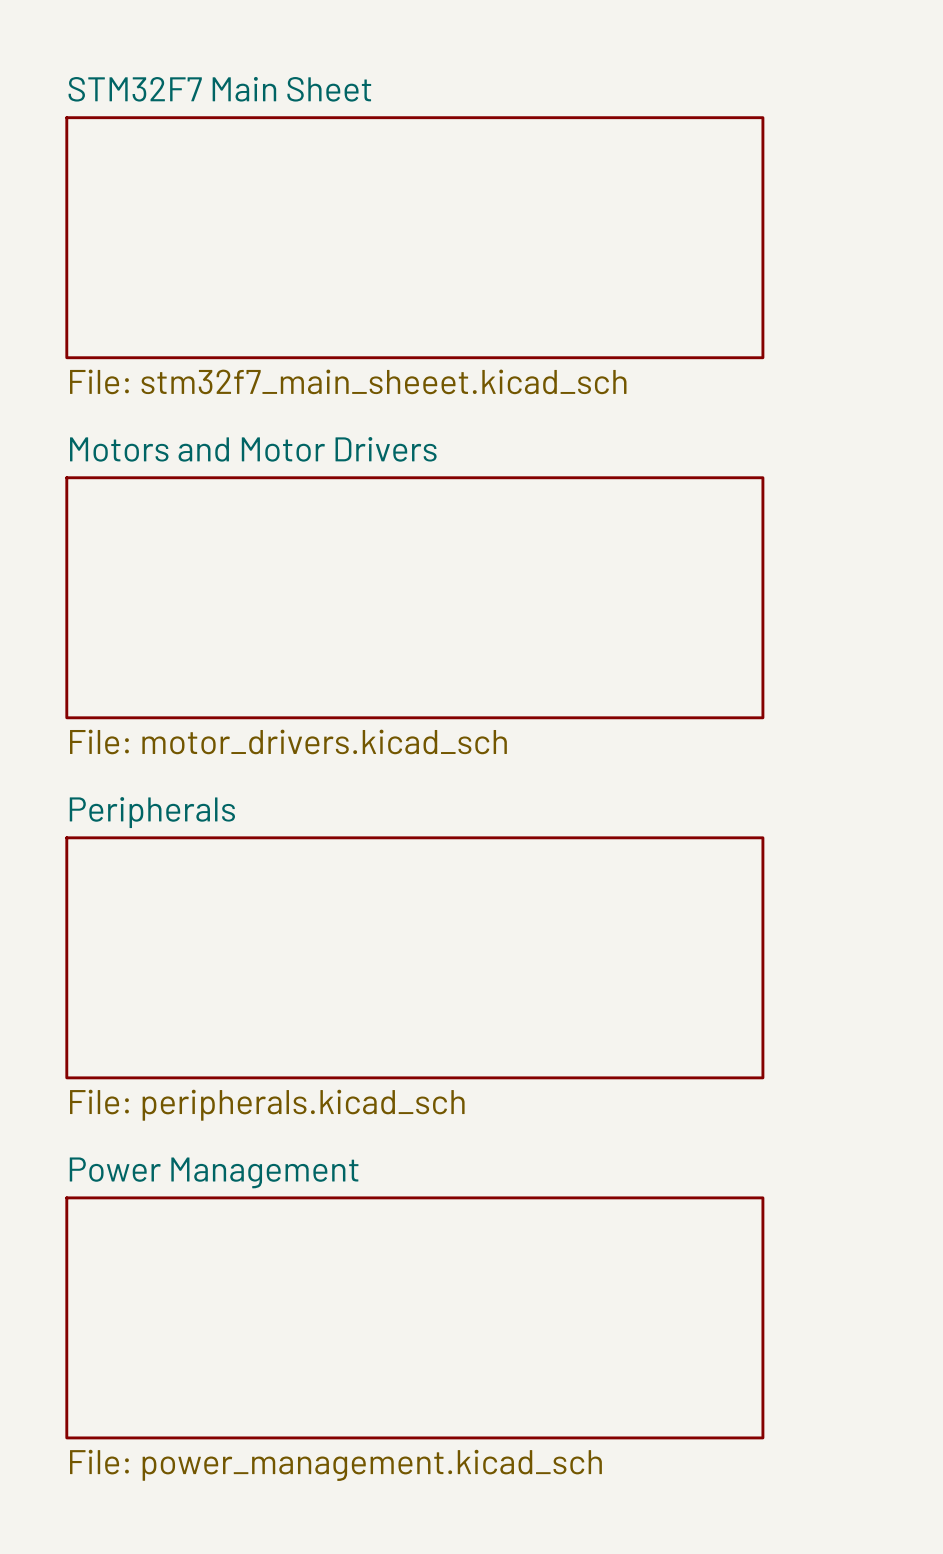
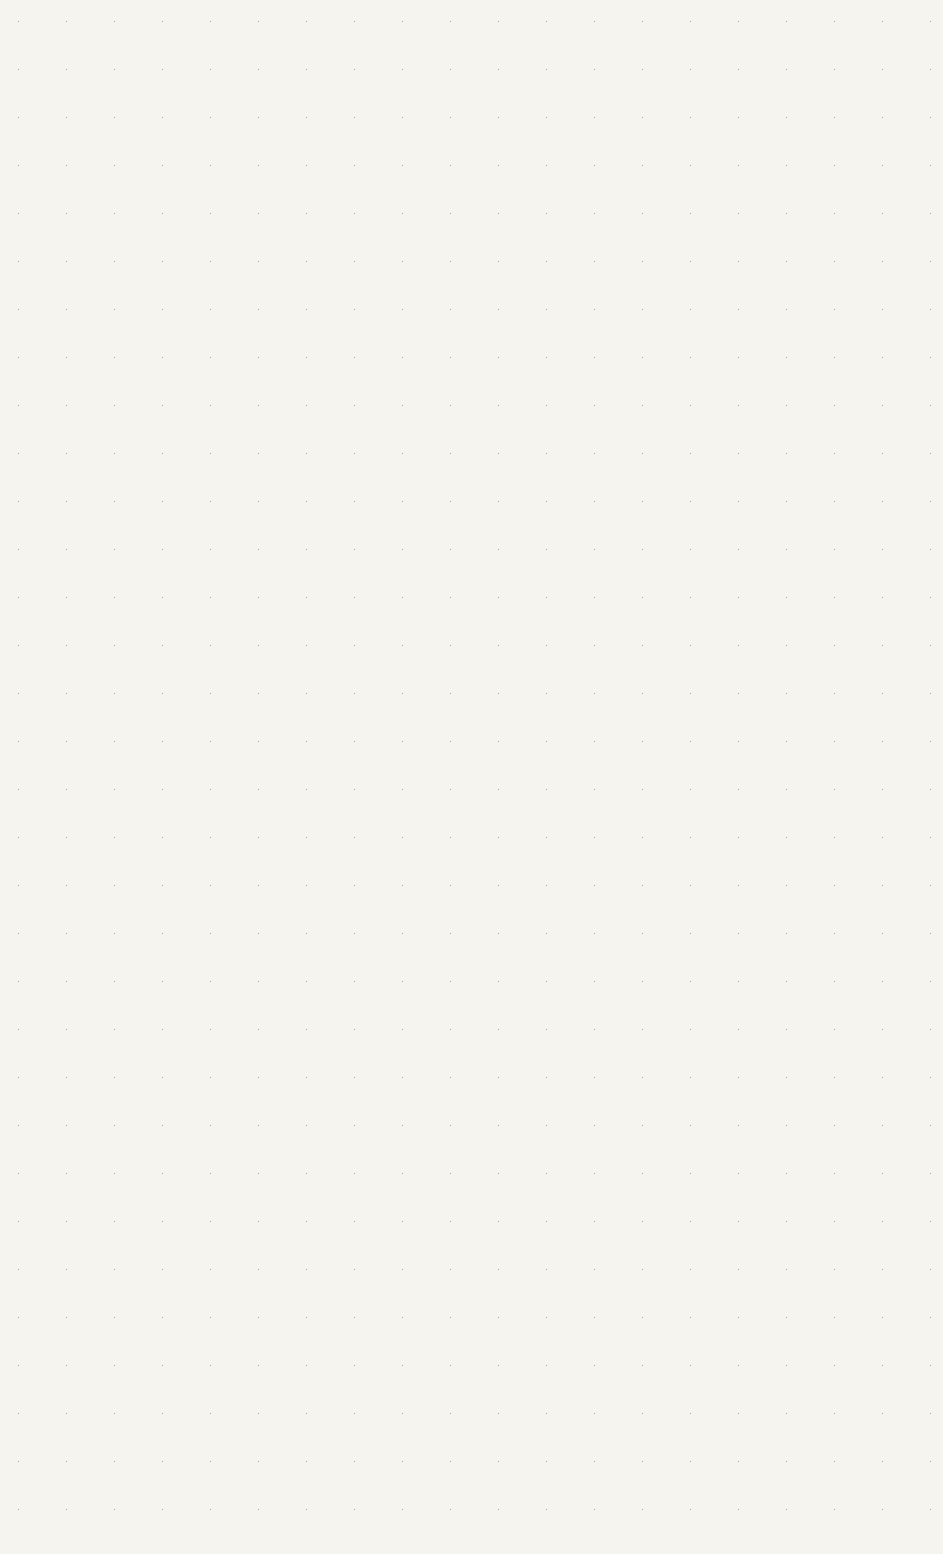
sheet STM32F7 Main Sheet: File: stm32f7_main_sheeet.kicad_sch (414, 237) -> none
sheet Motors and Motor Drivers: File: motor_drivers.kicad_sch (414, 597) -> none
sheet Peripherals: File: peripherals.kicad_sch (414, 957) -> none
sheet Power Management: File: power_management.kicad_sch (414, 1317) -> none

